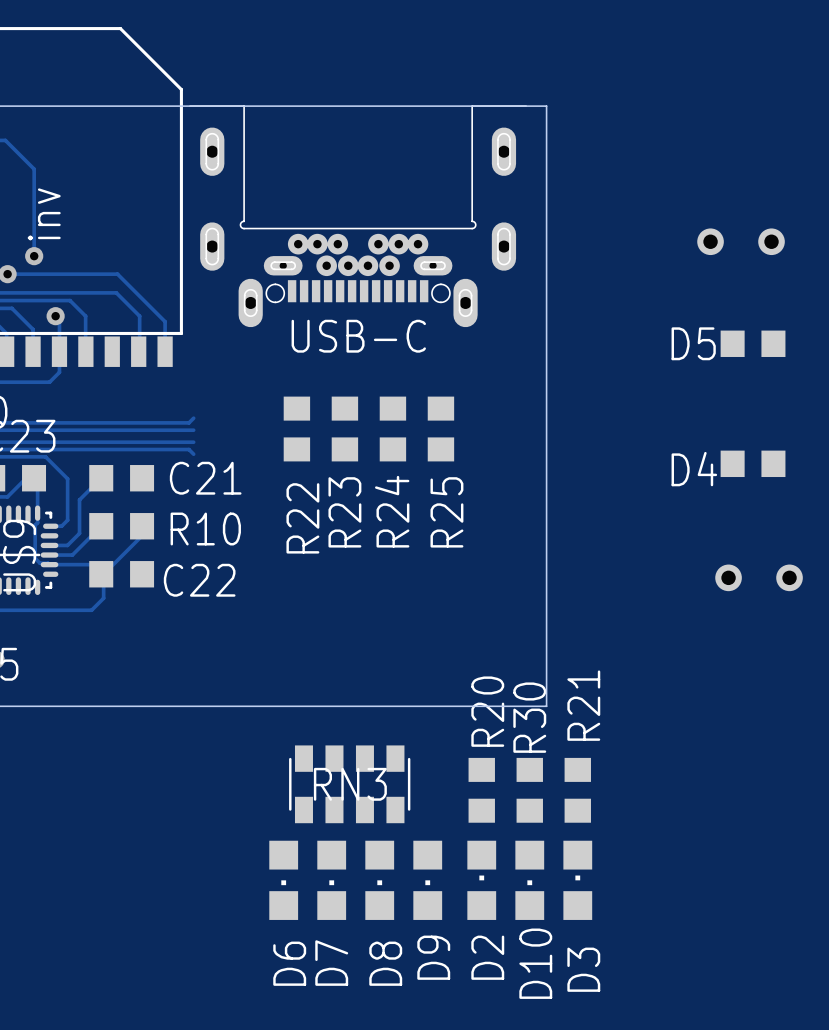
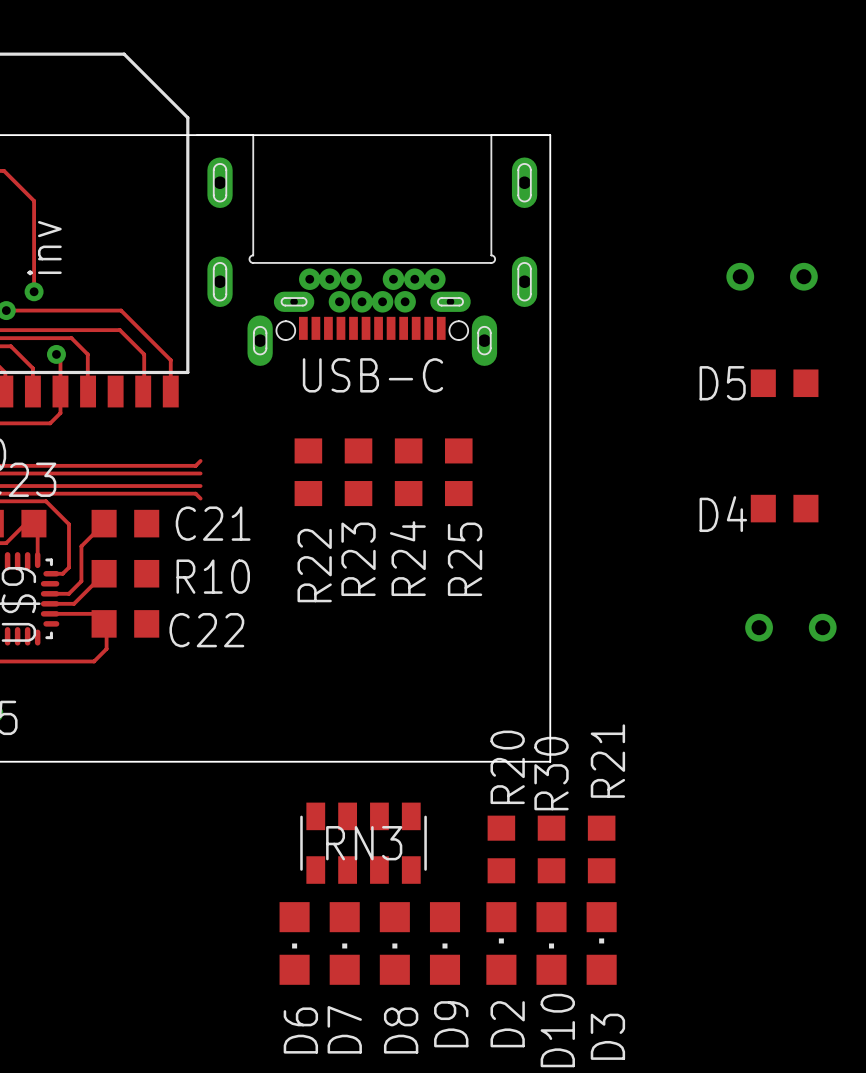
board edge: (528, 106) (546, 106) (546, 706) (528, 706) -> (550, 135) (550, 761)
track: (37, 513) (37, 522) (35, 525) (35, 558) (39, 563) (49, 564) -> none
track: (142, 526) (142, 535) (102, 575) -> none

